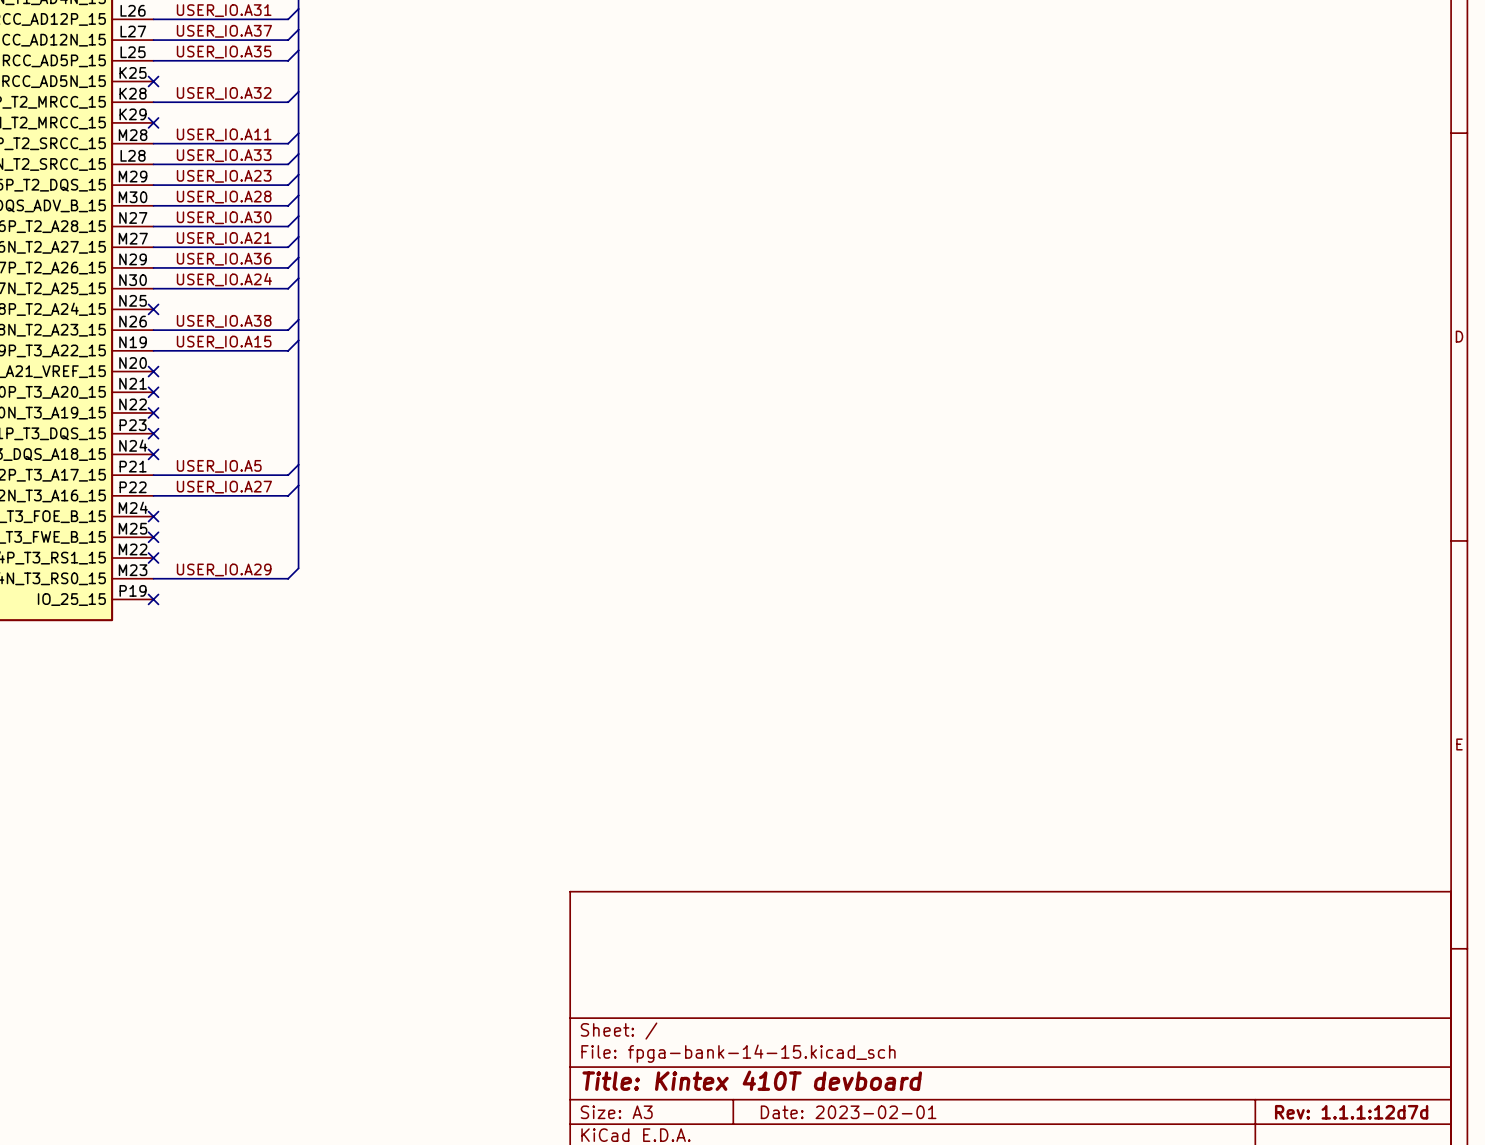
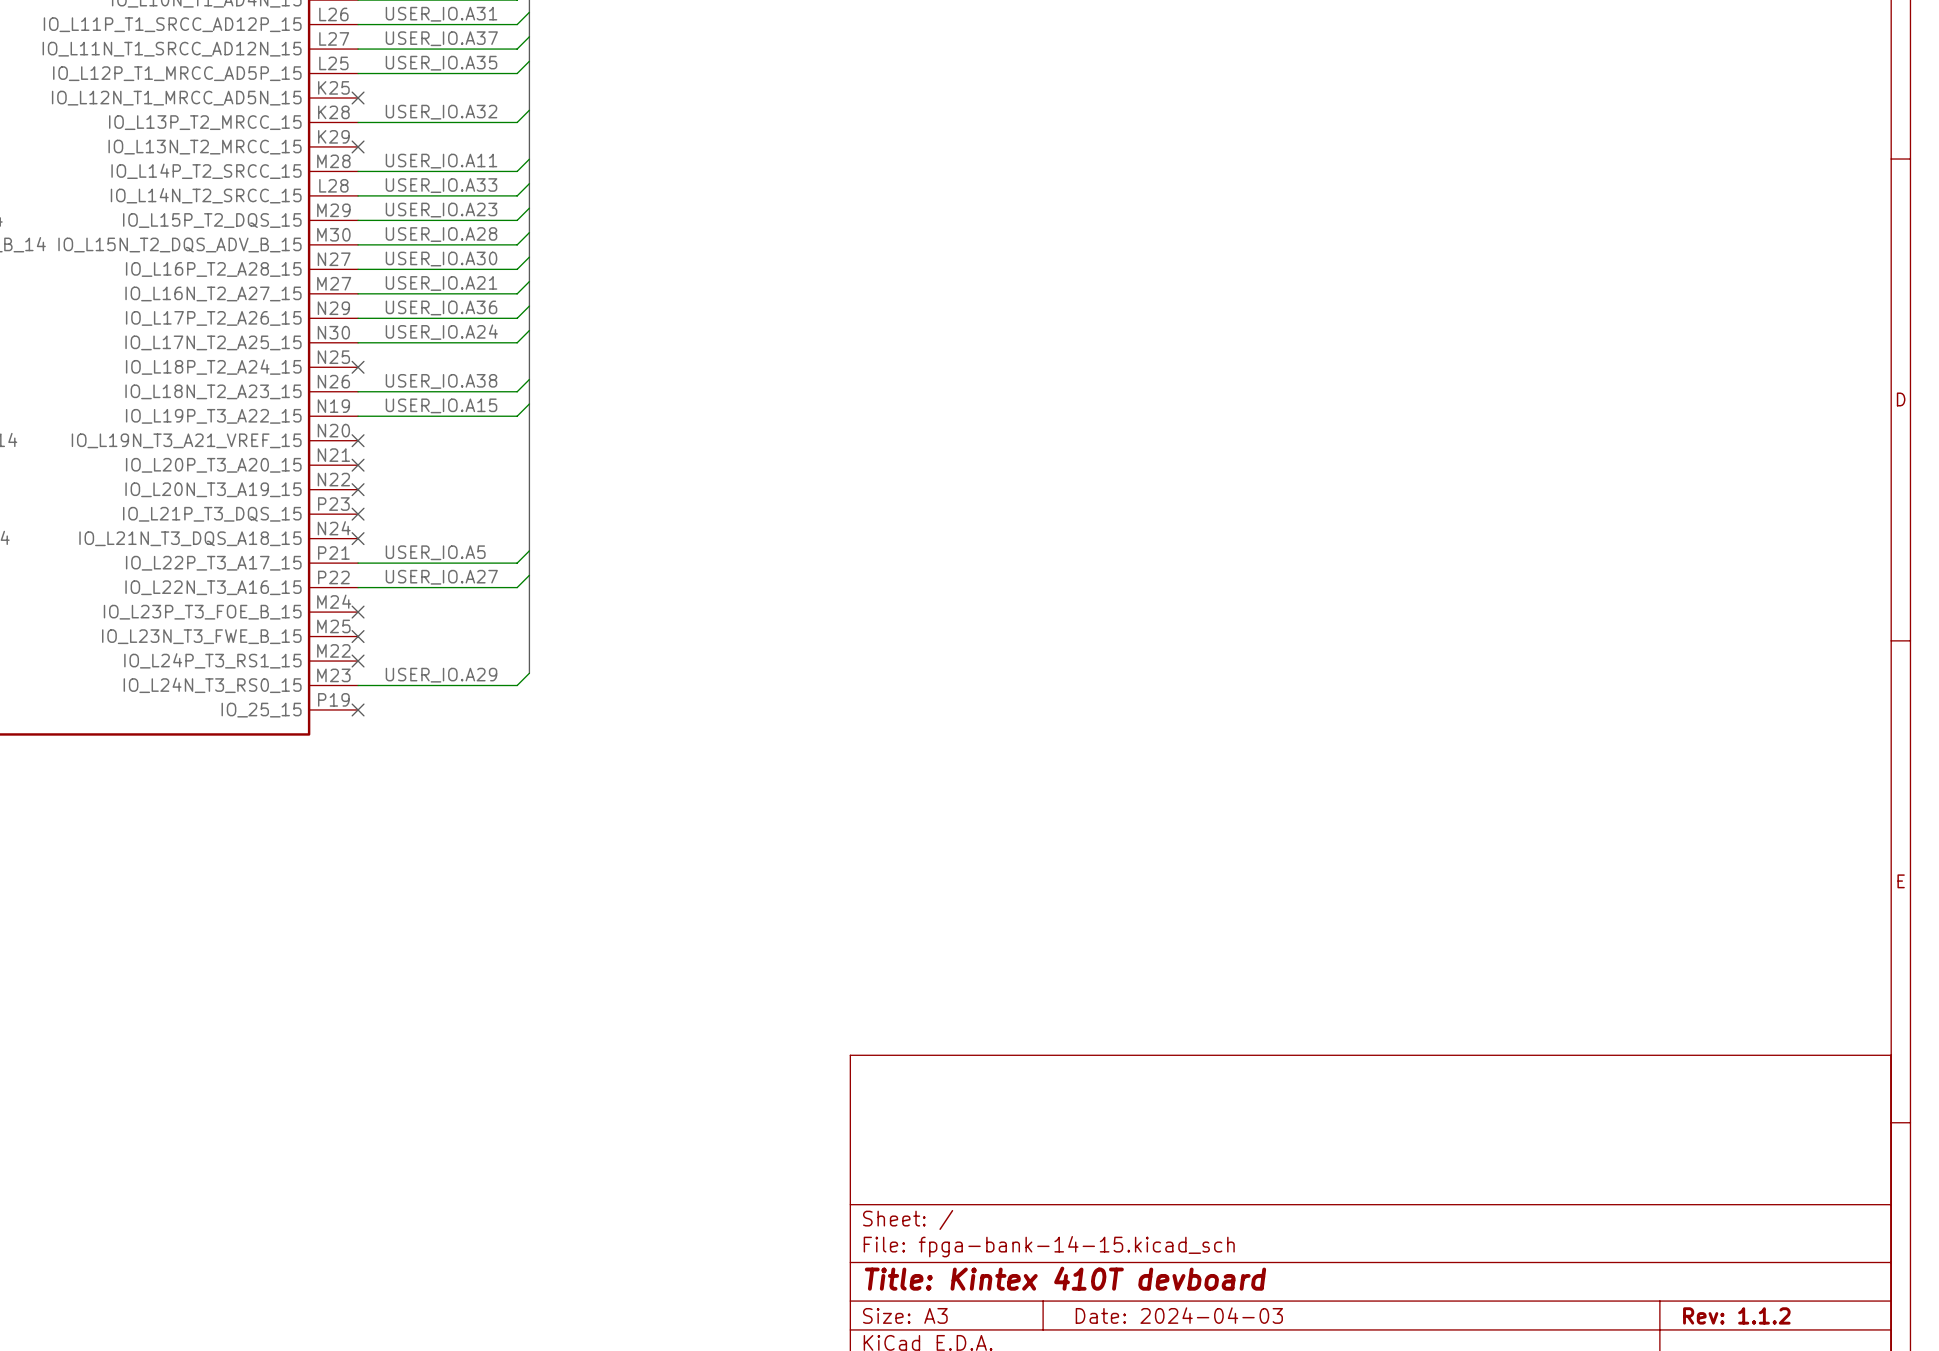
title block: Date: 2023-02-01 (848, 1112) -> Date: 2024-04-03 (1179, 1315)
title block: Rev: 1.1.1:12d7d (1351, 1112) -> Rev: 1.1.2 (1736, 1315)

